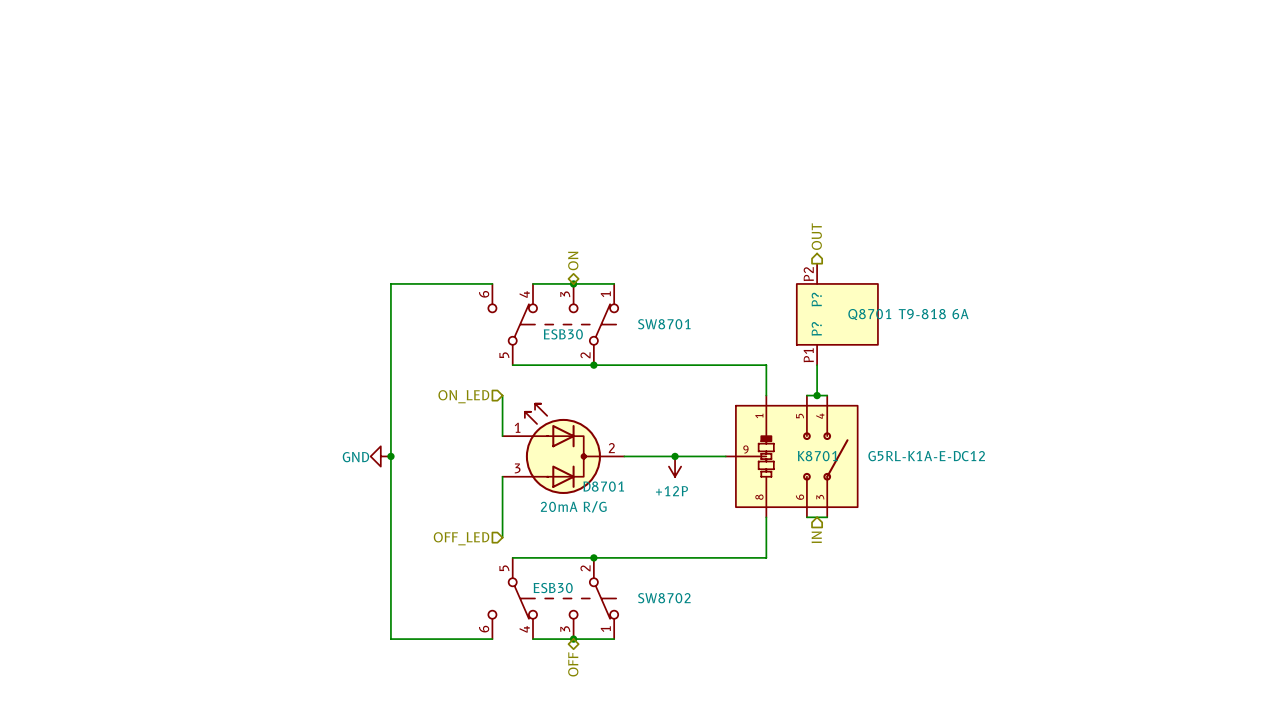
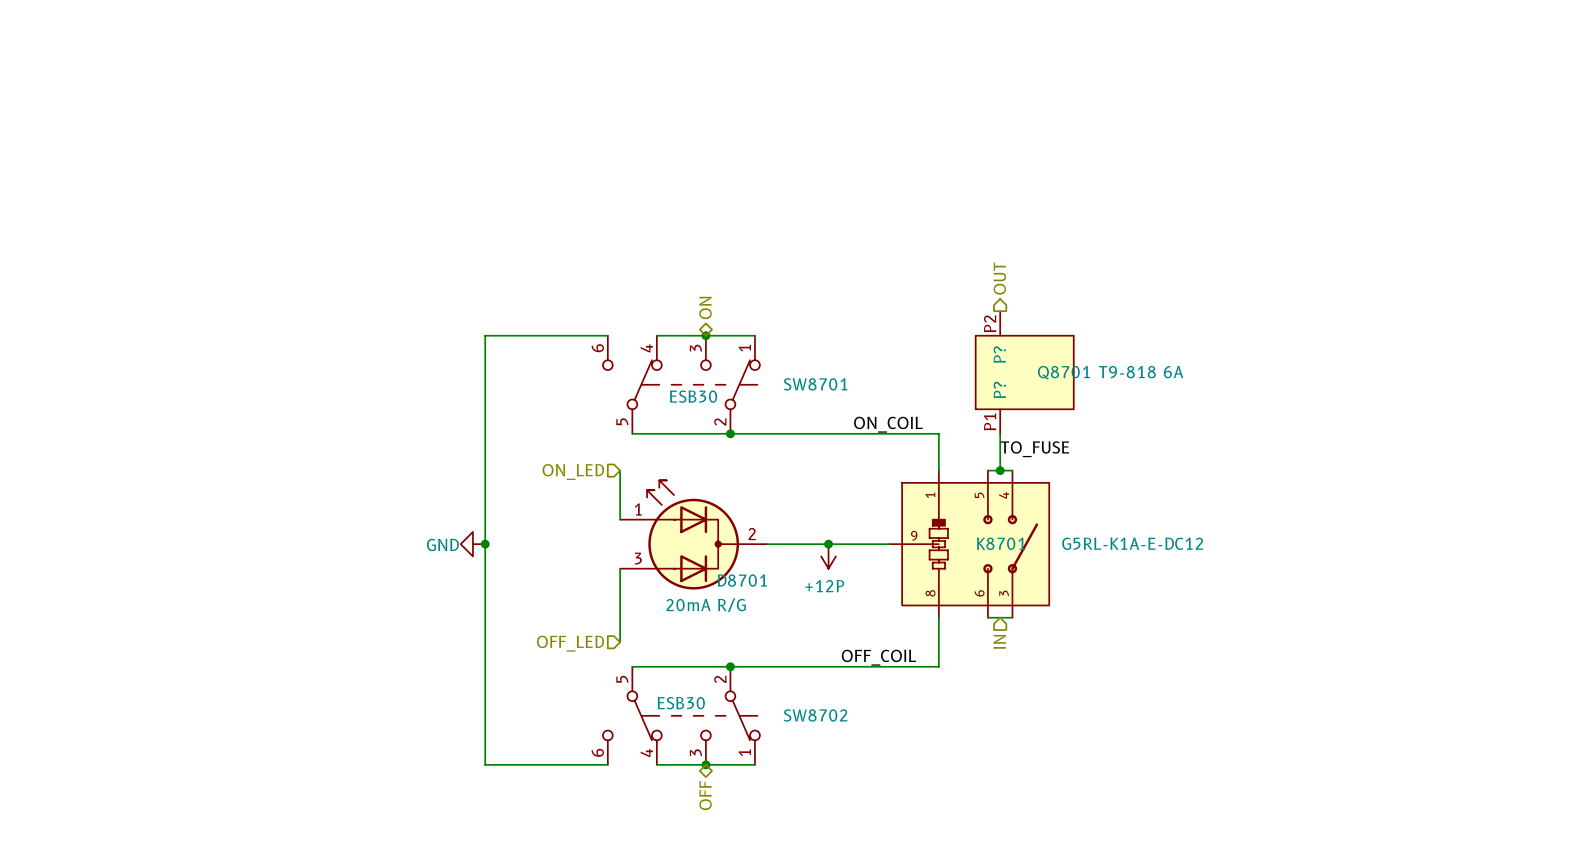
label: none -> ON_COIL (888, 424)
label: none -> TO_FUSE (1034, 449)
label: none -> OFF_COIL (878, 657)

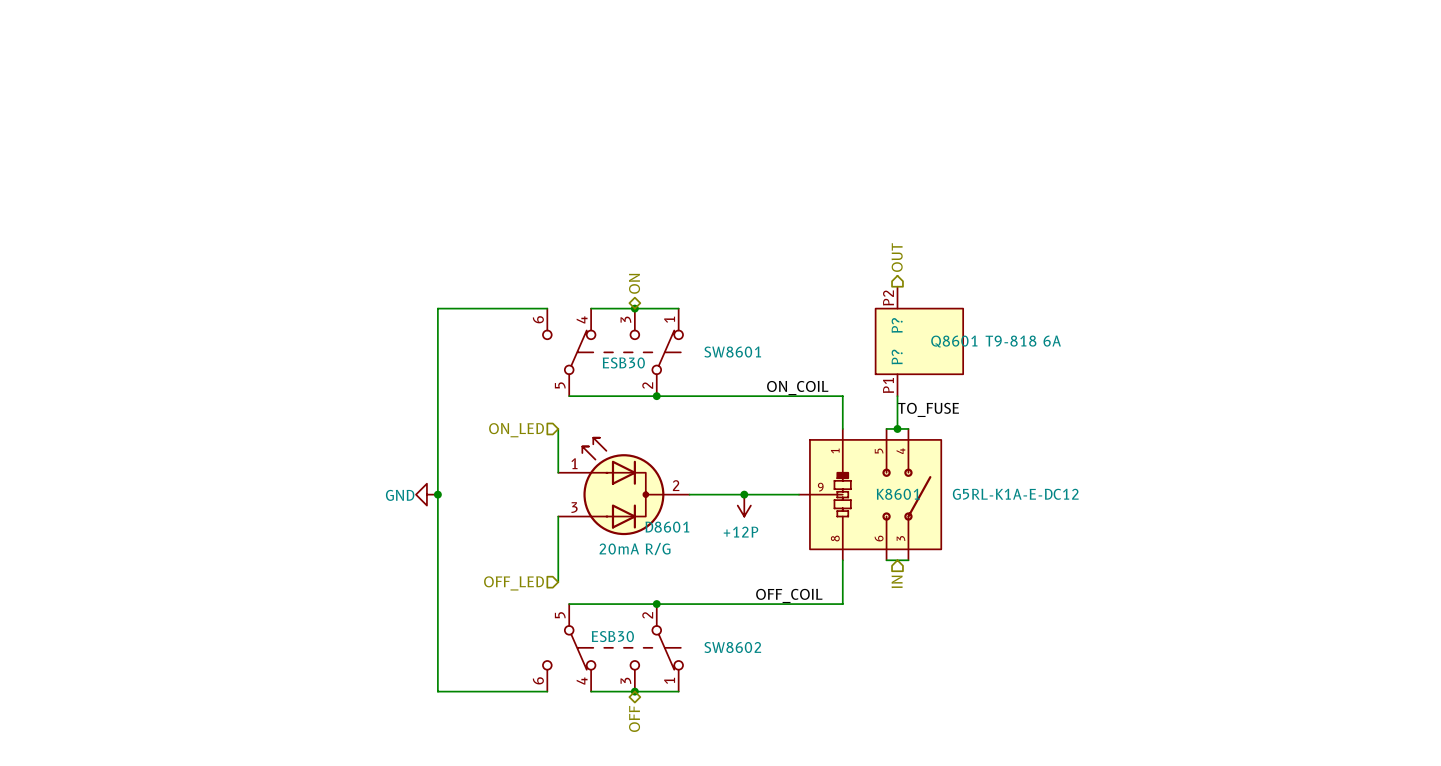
Q8701 name: Q8701 (1063, 372) -> Q8601 (954, 341)
SW8701 name: SW8701 (815, 384) -> SW8601 (732, 352)
K8701 name: K8701 (1001, 543) -> K8601 (898, 494)
D8701 name: D8701 (742, 580) -> D8601 (667, 527)
SW8702 name: SW8702 (815, 715) -> SW8602 (732, 647)

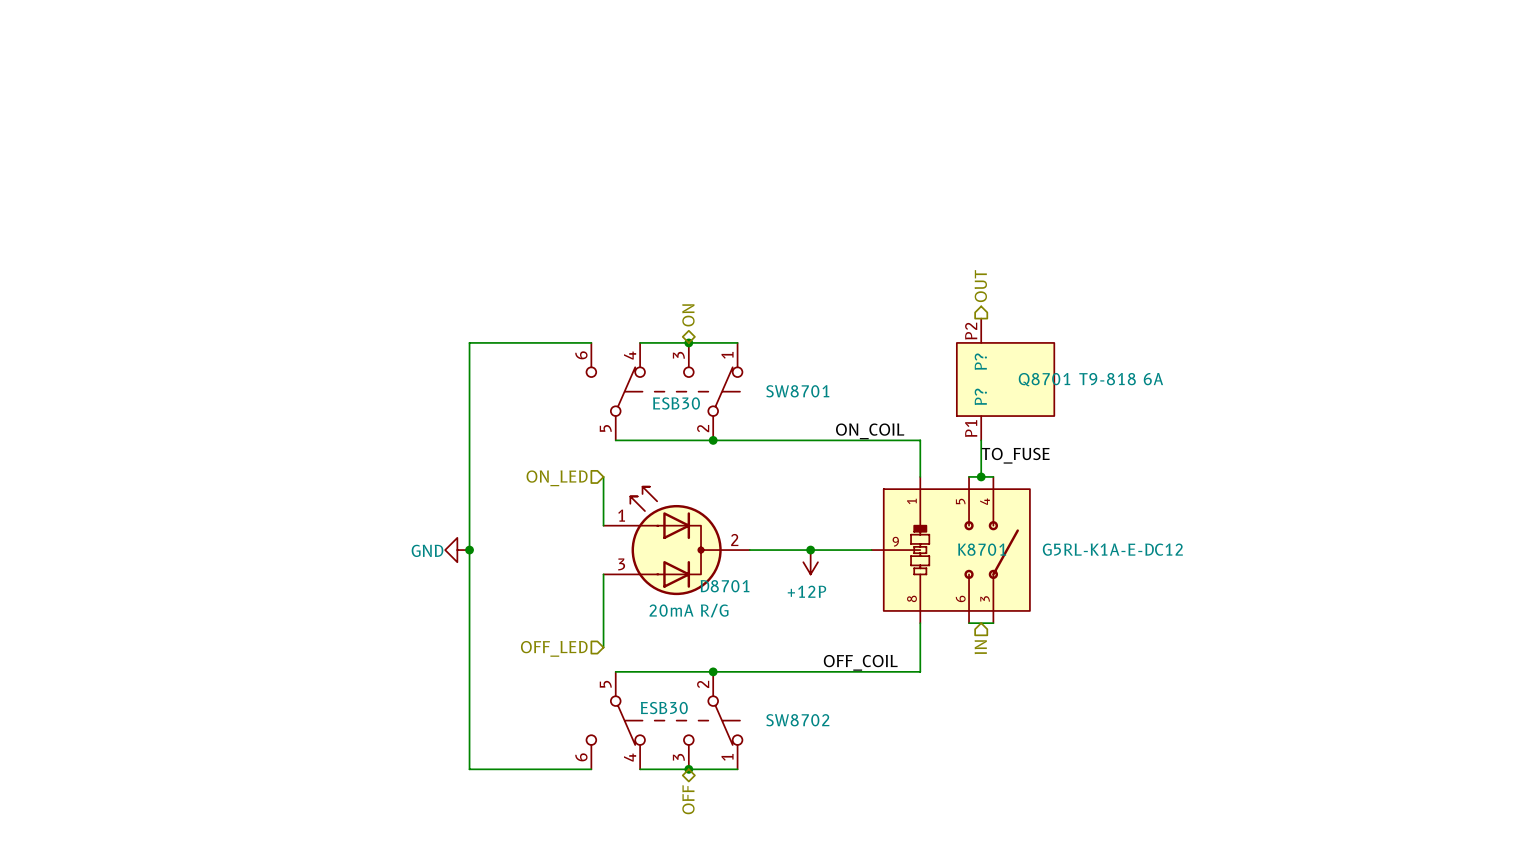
Q8601 name: Q8601 (954, 341) -> Q8701 (1044, 379)
SW8601 name: SW8601 (732, 352) -> SW8701 (797, 391)
K8601 name: K8601 (898, 494) -> K8701 (982, 549)
D8601 name: D8601 (667, 527) -> D8701 (725, 586)
SW8602 name: SW8602 (732, 647) -> SW8702 (797, 720)

